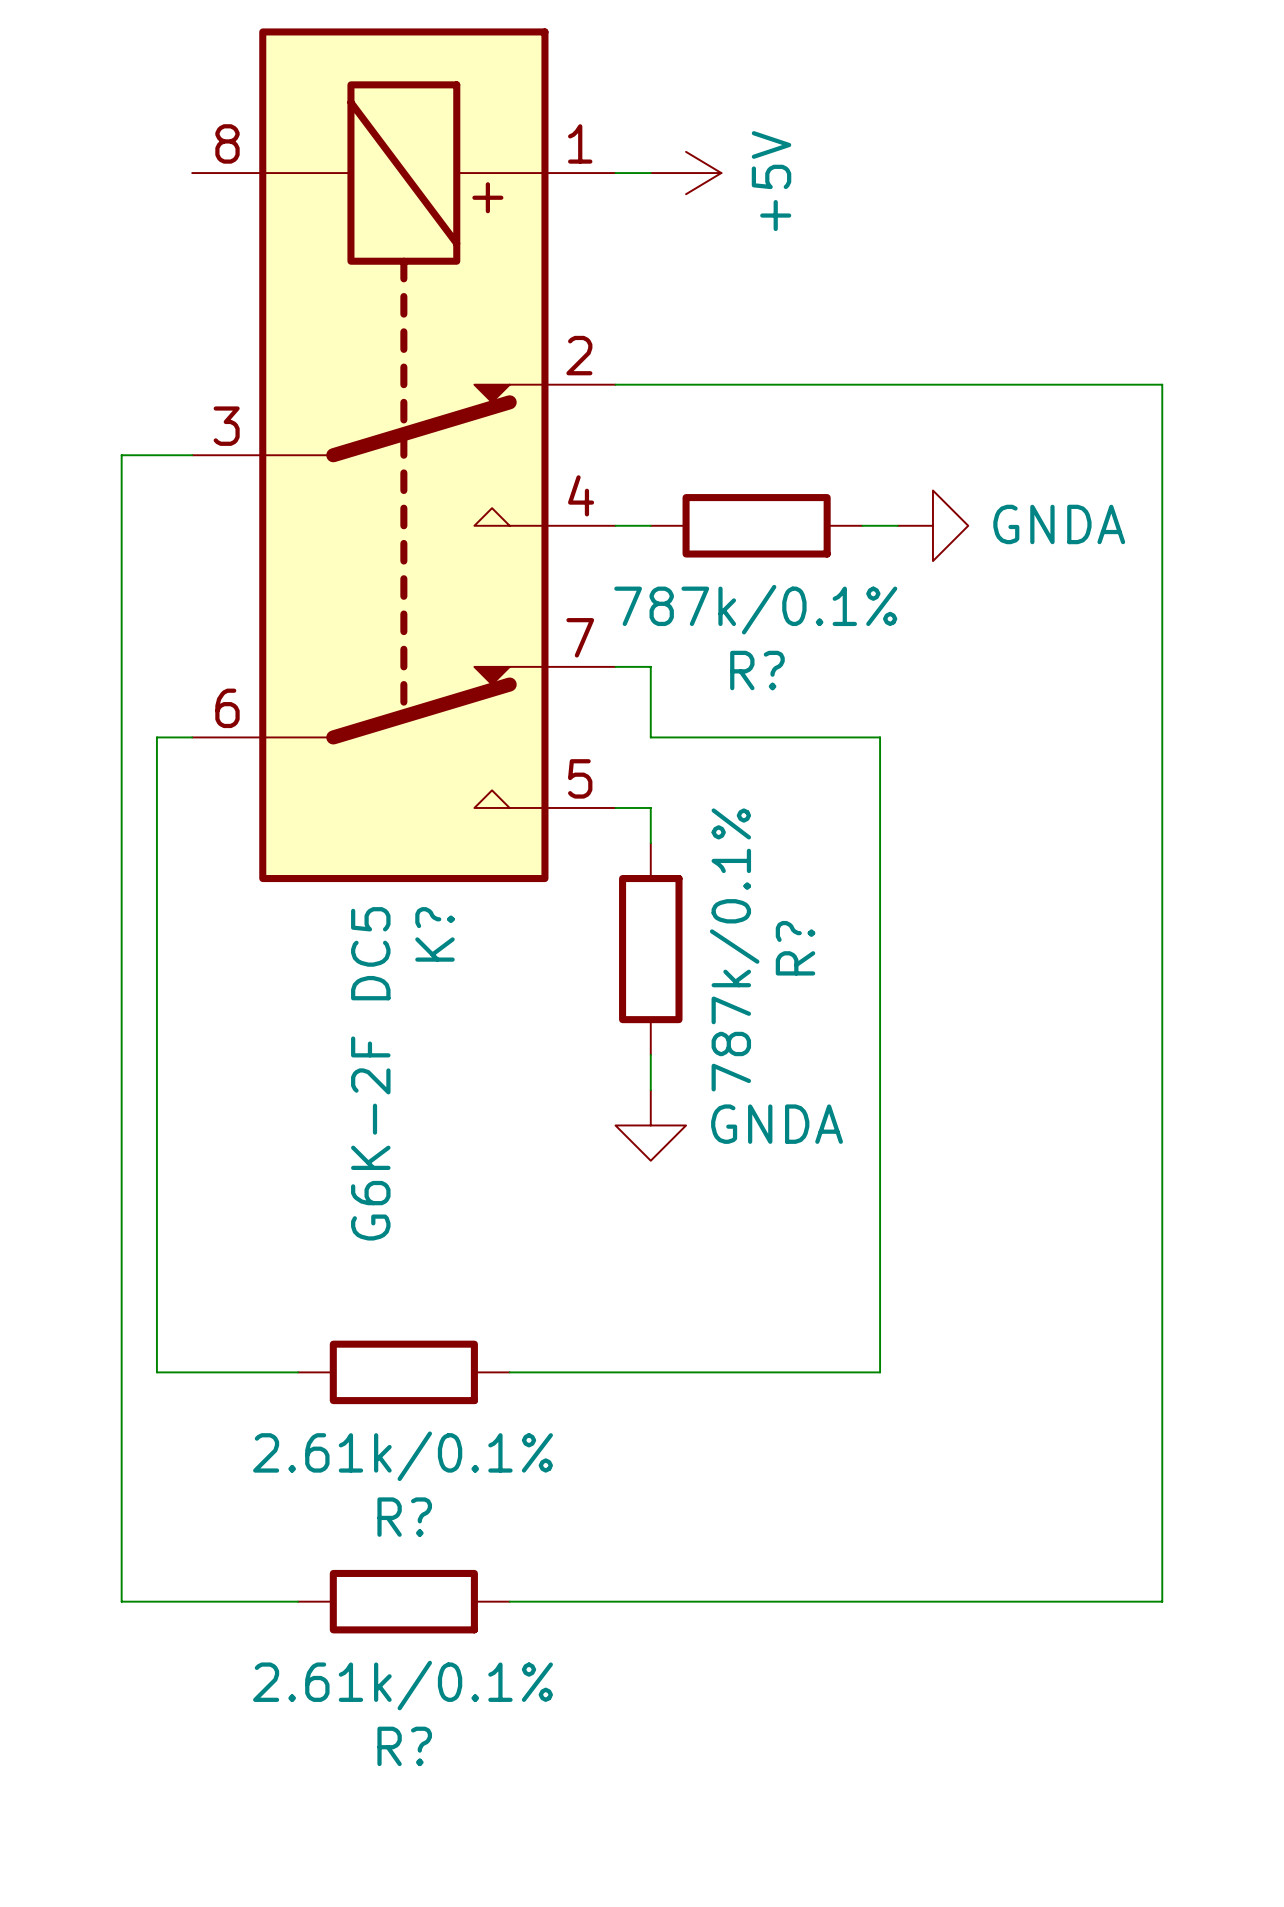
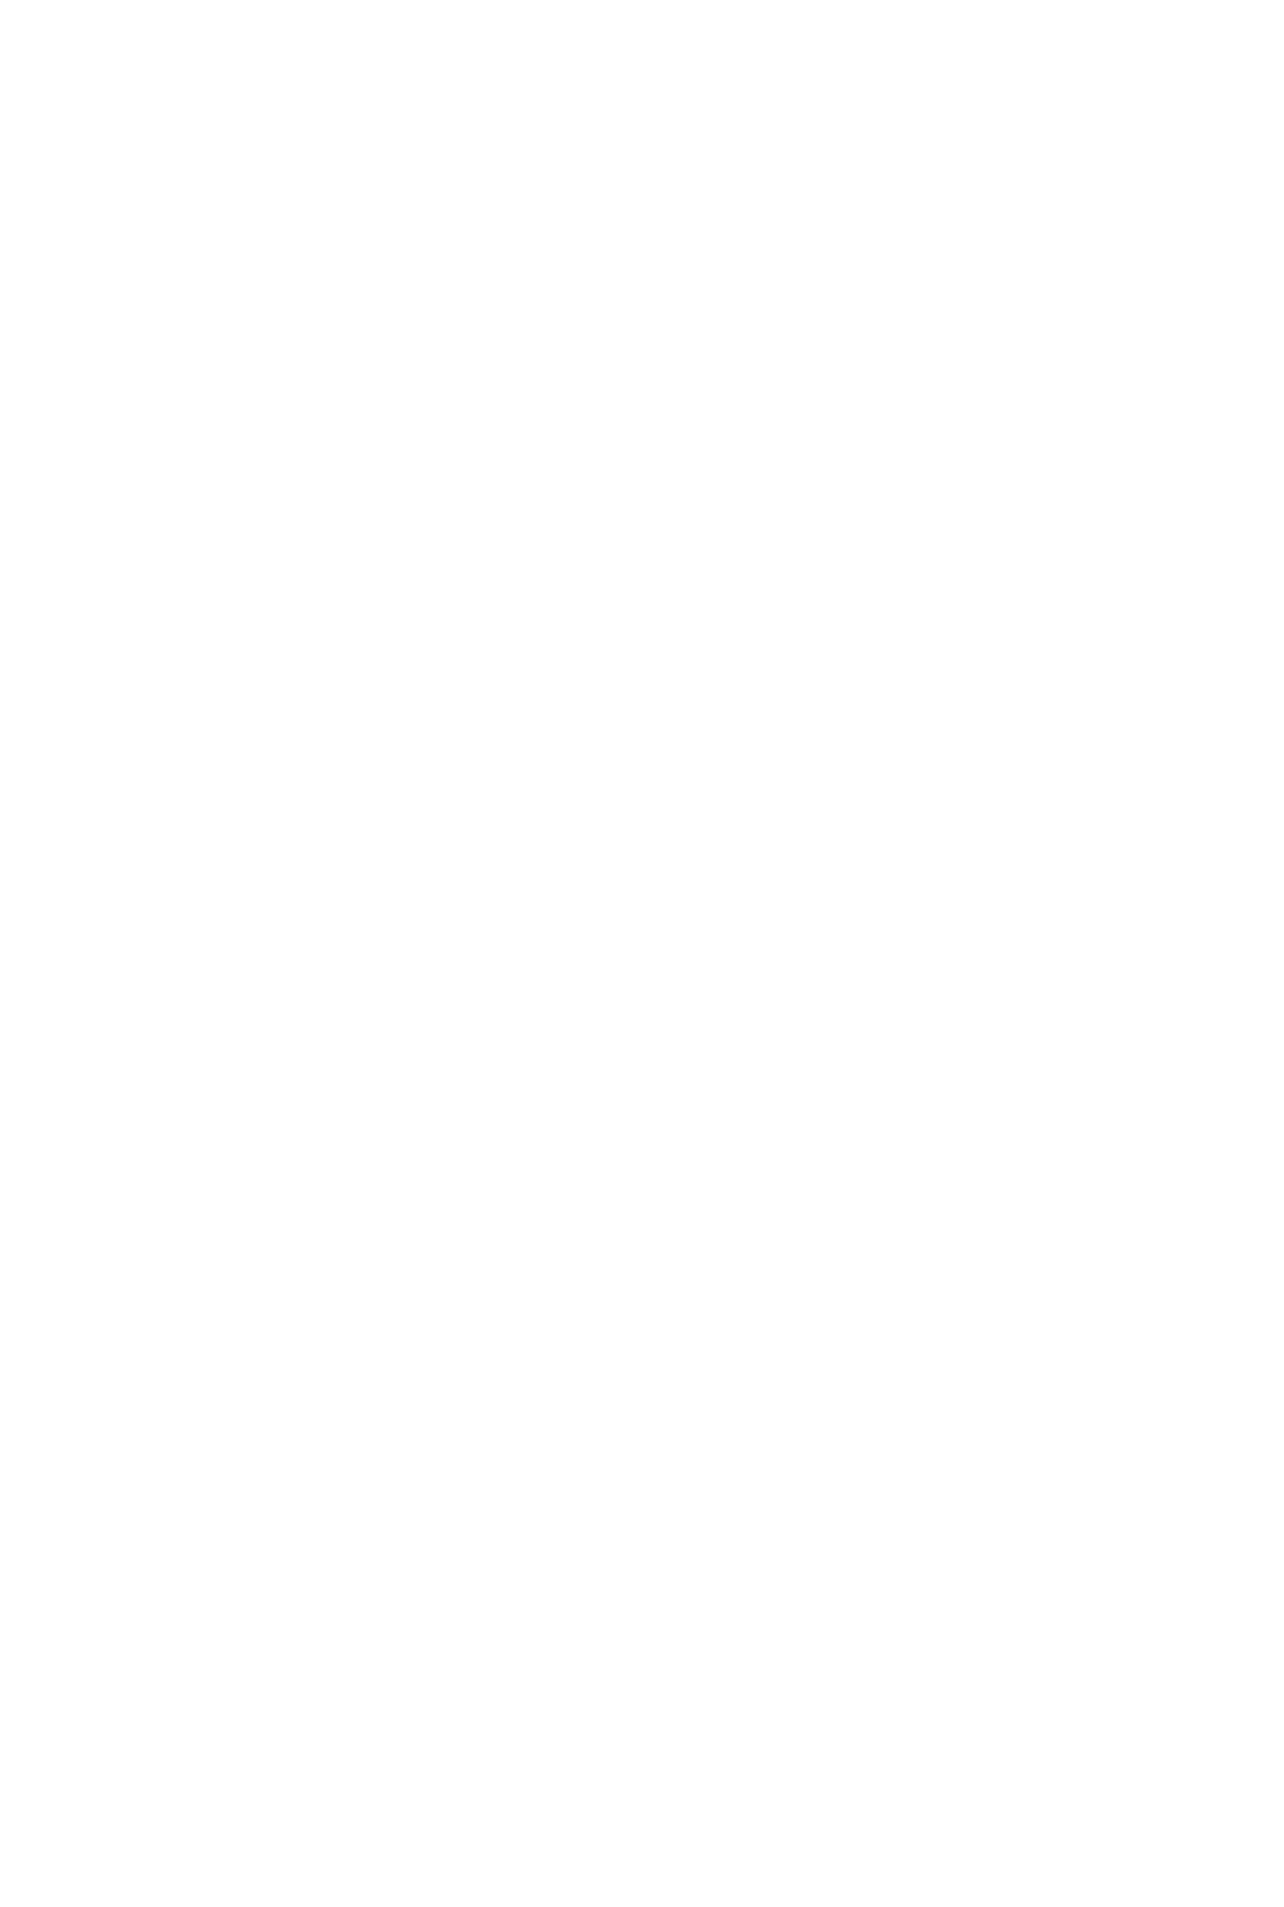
wire: (615, 173) (650, 173) -> none
power symbol: +5V (686, 173) -> none
wire: (615, 384) (1162, 384) (1162, 1601) (509, 1601) -> none
wire: (192, 455) (121, 455) (121, 1601) (298, 1601) -> none
K?: G6K-2F DC5 (403, 455) -> none
wire: (615, 525) (650, 525) -> none
R?: 787k/0.1% (756, 525) -> none
wire: (862, 525) (897, 525) -> none
power symbol: GNDA (932, 525) -> none
wire: (615, 666) (650, 666) (650, 737) (880, 737) (880, 1372) (509, 1372) -> none
wire: (192, 737) (156, 737) (156, 1372) (298, 1372) -> none
wire: (615, 807) (650, 807) (650, 843) -> none
R?: 787k/0.1% (650, 949) -> none
wire: (650, 1054) (650, 1090) -> none
power symbol: GNDA (650, 1125) -> none
R?: 2.61k/0.1% (403, 1372) -> none
R?: 2.61k/0.1% (403, 1601) -> none

